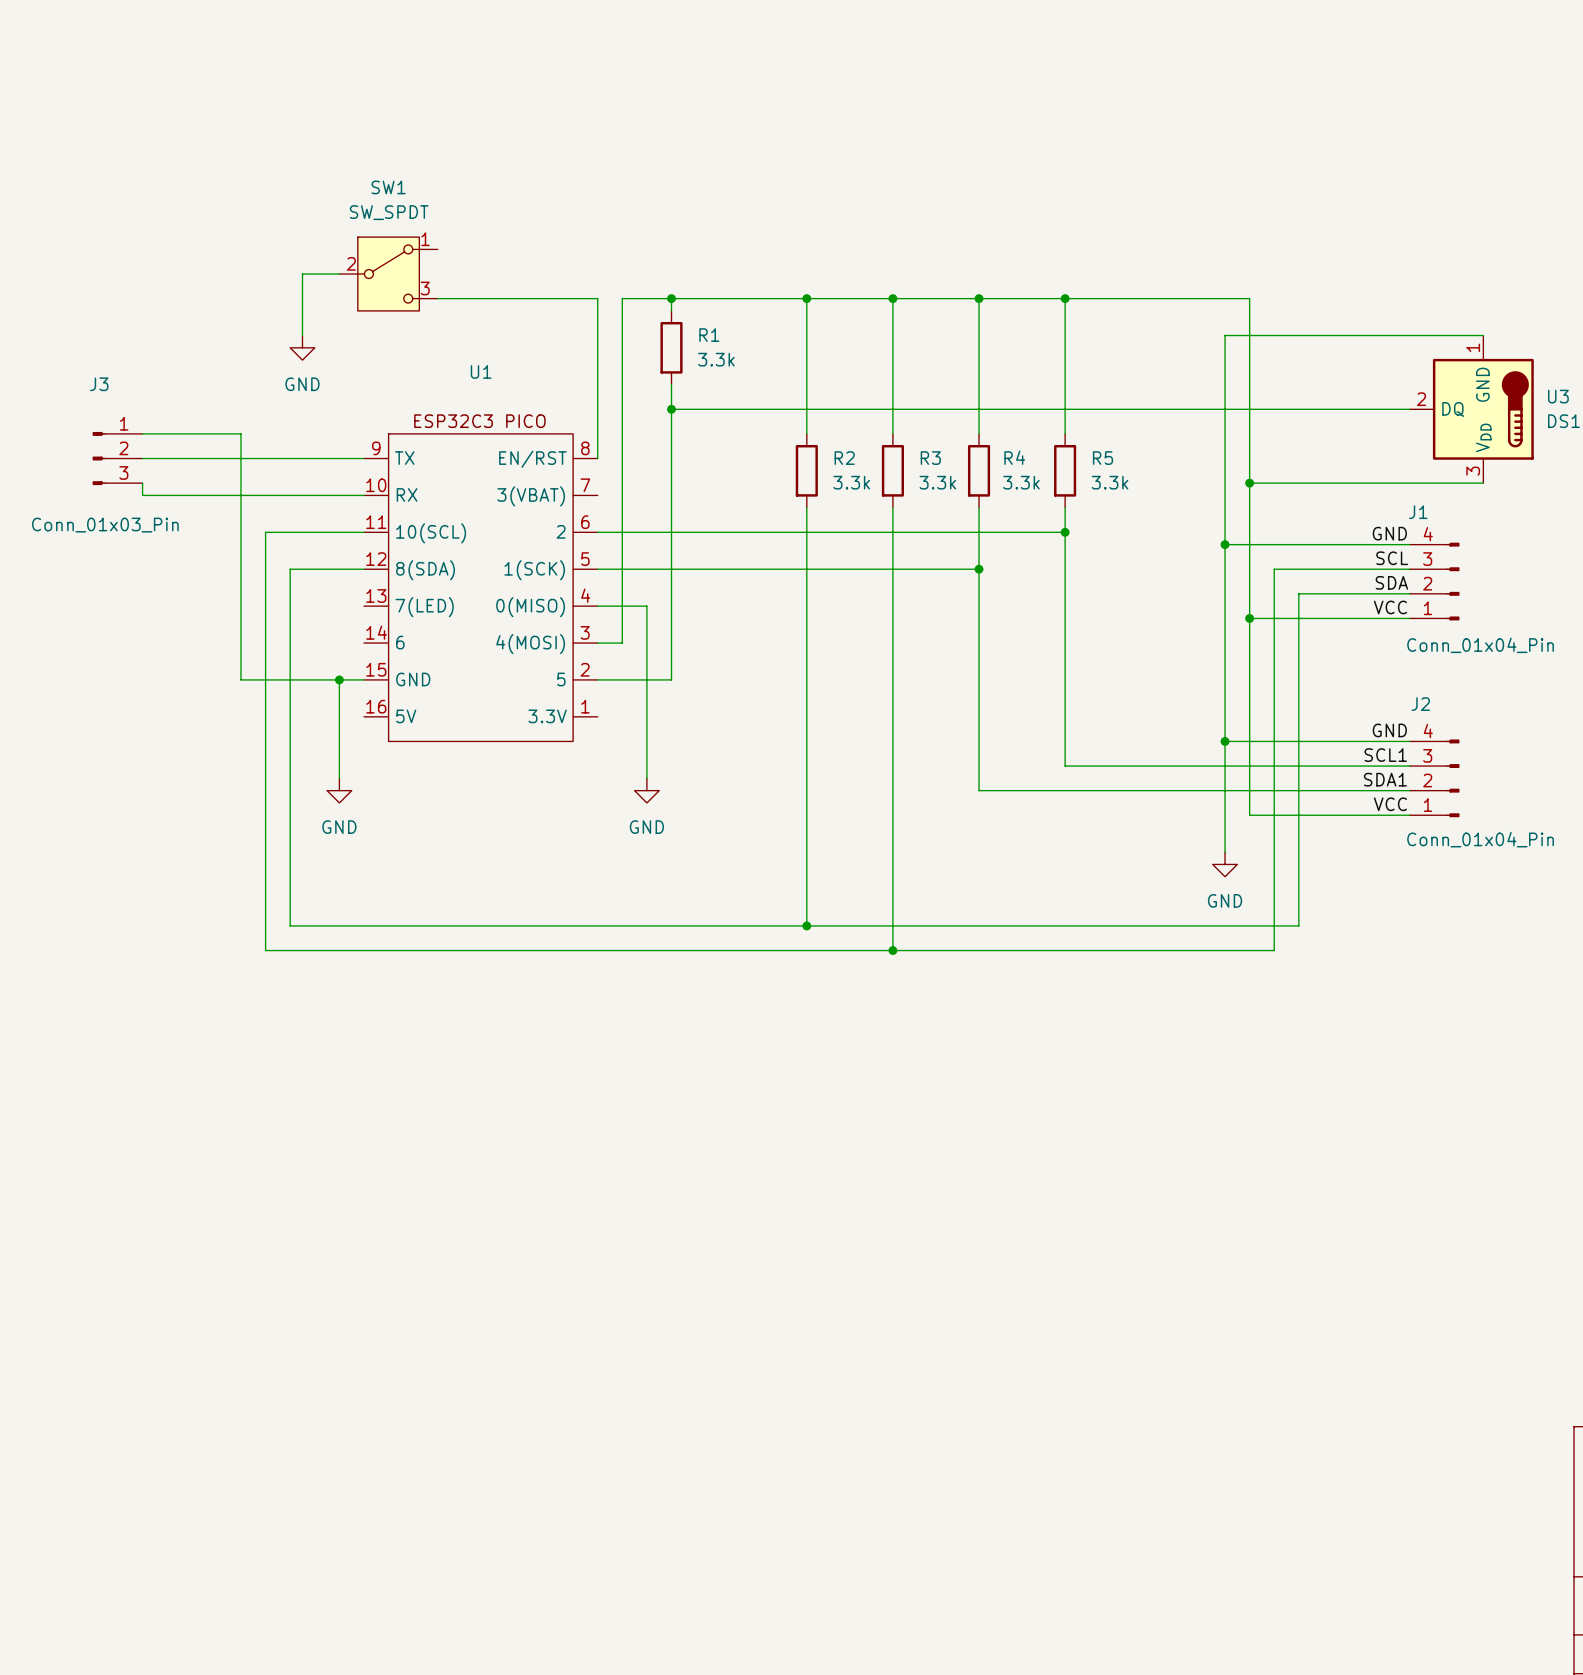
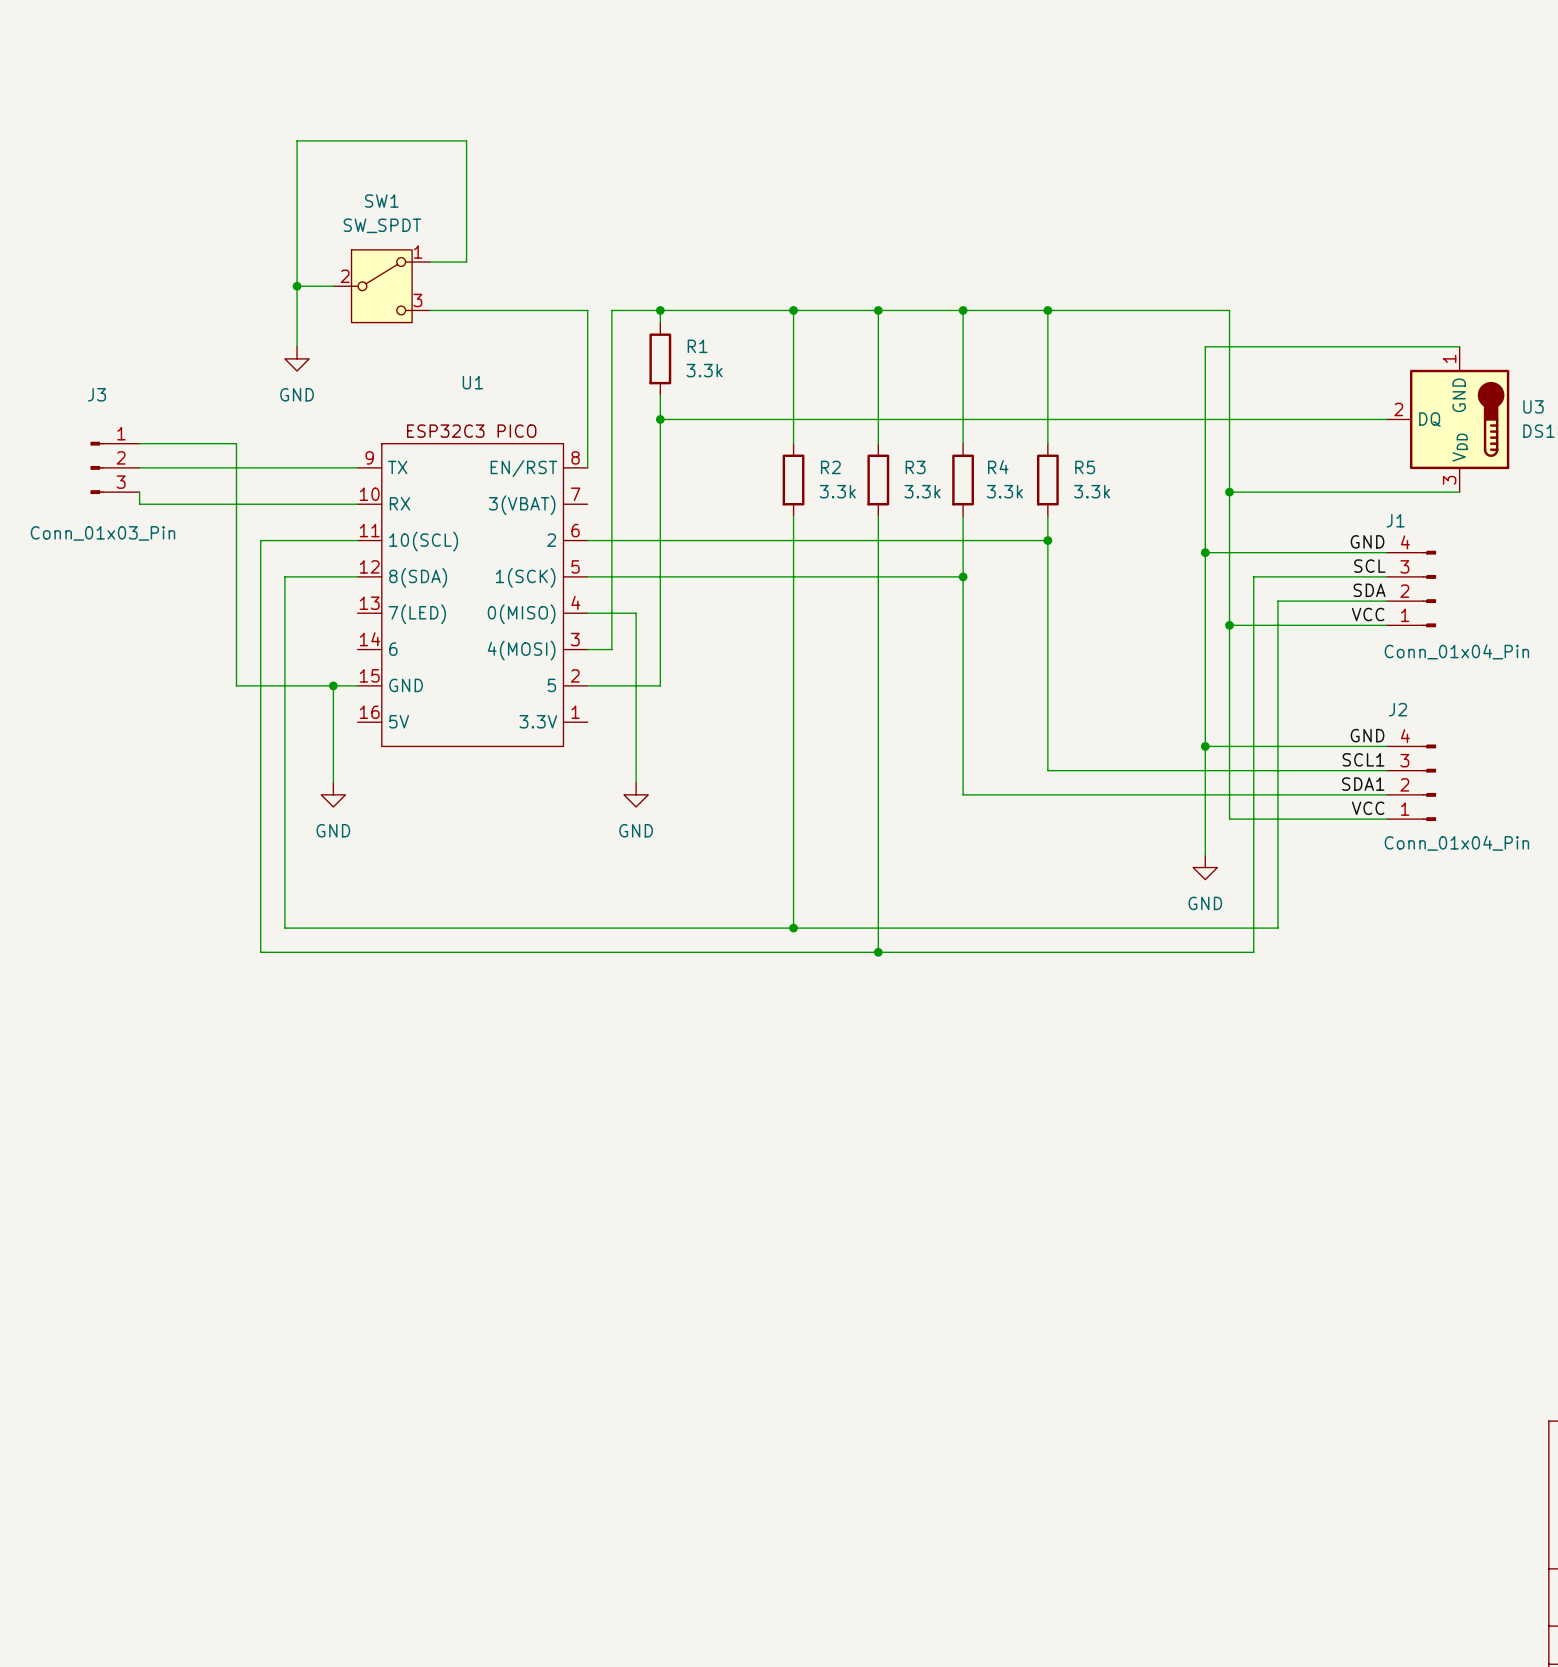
wire: none -> (430, 262) (466, 262) (466, 140) (297, 140) (297, 286)
junction: none -> (297, 286)

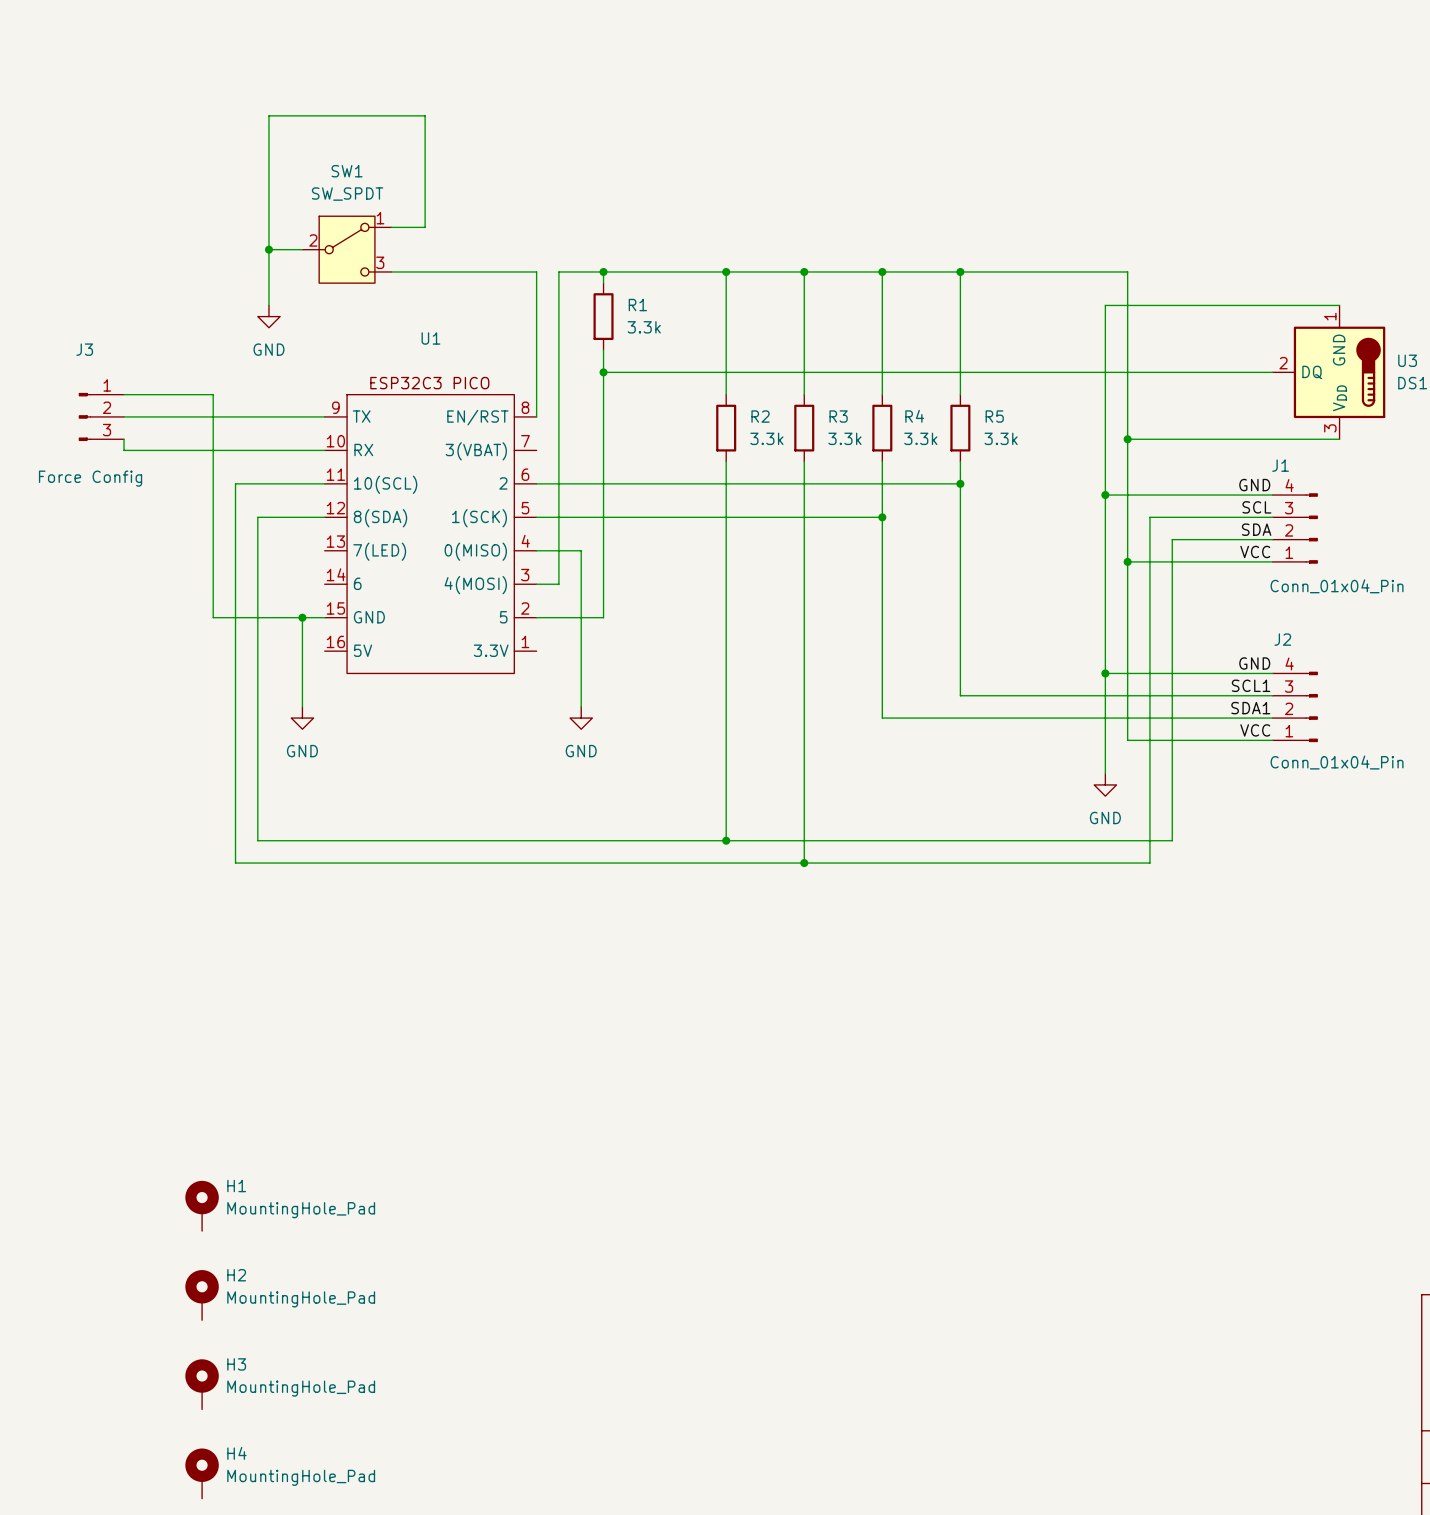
J3 value: Conn_01x03_Pin (102, 533) -> Force Config (90, 478)
H1: none -> MountingHole_Pad (202, 1205)
H2: none -> MountingHole_Pad (202, 1295)
H3: none -> MountingHole_Pad (202, 1384)
H4: none -> MountingHole_Pad (202, 1473)

